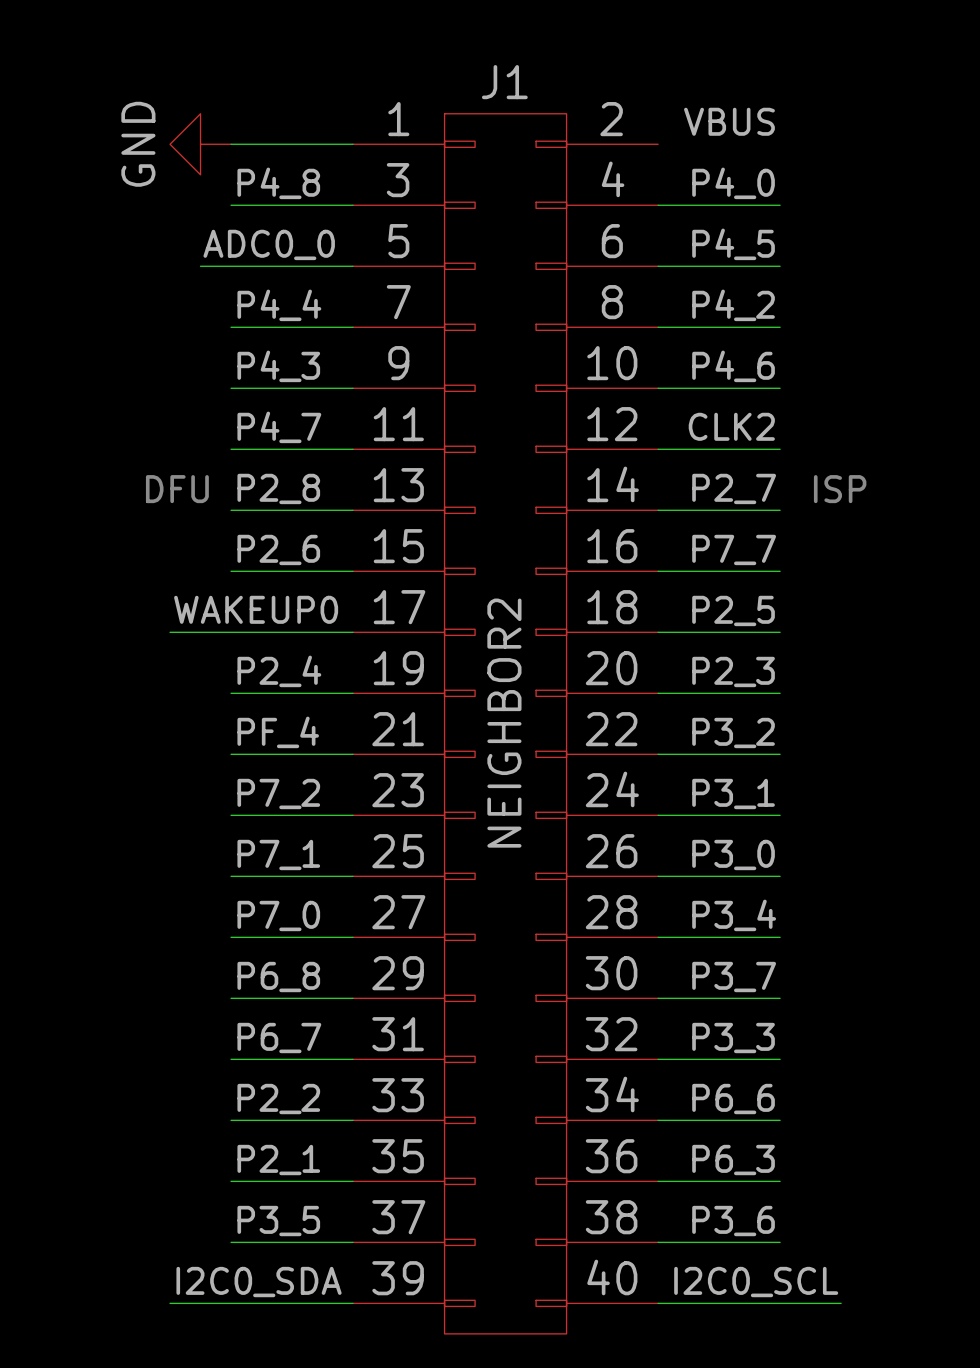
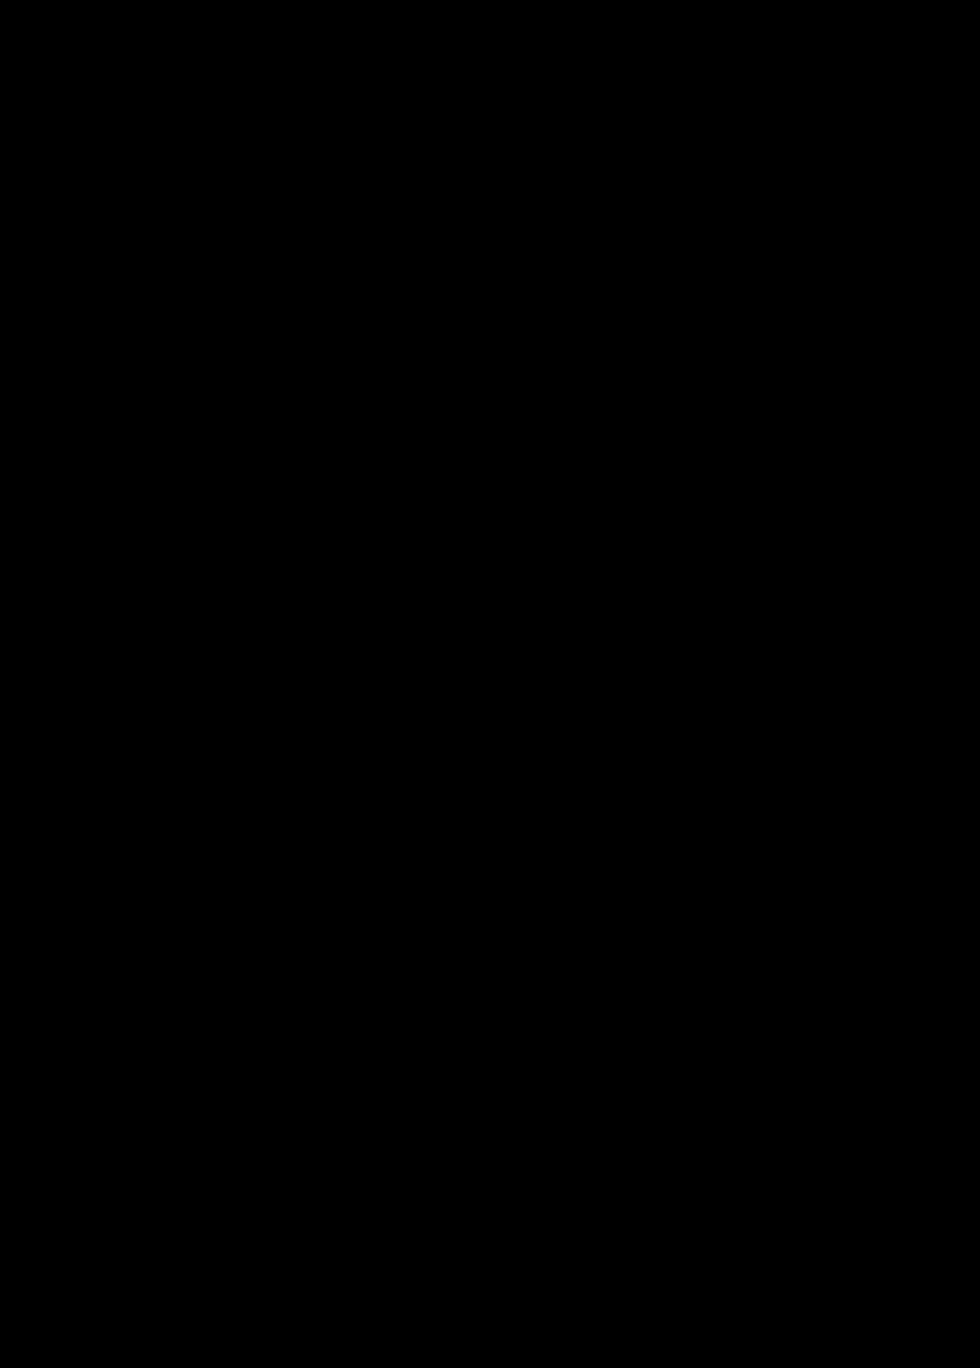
label: VBUS (729, 121) -> none
power symbol: GND (200, 144) -> none
wire: (231, 144) (353, 144) -> none
label: P4_8 (278, 183) -> none
label: P4_0 (733, 183) -> none
wire: (231, 205) (353, 205) -> none
wire: (658, 205) (780, 205) -> none
label: ADC0_0 (269, 244) -> none
label: P4_5 (733, 244) -> none
wire: (200, 266) (353, 266) -> none
wire: (658, 266) (780, 266) -> none
label: P4_4 (279, 305) -> none
label: P4_2 (733, 305) -> none
wire: (231, 327) (353, 327) -> none
wire: (658, 327) (780, 327) -> none
label: P4_3 (278, 366) -> none
label: P4_6 (733, 366) -> none
wire: (231, 388) (353, 388) -> none
wire: (658, 388) (780, 388) -> none
label: CLK2 (731, 426) -> none
label: P4_7 (279, 427) -> none
wire: (231, 449) (353, 449) -> none
wire: (658, 449) (780, 449) -> none
label: P2_8 (278, 488) -> none
label: P2_7 (734, 488) -> none
text: DFU (177, 489) -> none
text: ISP (840, 489) -> none
wire: (231, 510) (353, 510) -> none
wire: (658, 510) (780, 510) -> none
label: P2_6 (278, 549) -> none
label: P7_7 (734, 549) -> none
wire: (231, 571) (353, 571) -> none
wire: (658, 571) (780, 571) -> none
label: WAKEUP0 (256, 609) -> none
label: P2_5 (733, 610) -> none
wire: (170, 632) (353, 632) -> none
wire: (658, 632) (780, 632) -> none
label: P2_4 (279, 671) -> none
label: P2_3 (733, 671) -> none
wire: (231, 693) (353, 693) -> none
wire: (658, 693) (780, 693) -> none
J1: NEIGHBOR2 (505, 723) -> none
label: PF_4 (278, 732) -> none
label: P3_2 (733, 732) -> none
wire: (231, 754) (353, 754) -> none
wire: (658, 754) (780, 754) -> none
label: P7_2 (278, 793) -> none
label: P3_1 (733, 793) -> none
wire: (231, 815) (353, 815) -> none
wire: (658, 815) (780, 815) -> none
label: P7_1 (278, 854) -> none
label: P3_0 (733, 854) -> none
wire: (231, 876) (353, 876) -> none
wire: (658, 876) (780, 876) -> none
label: P7_0 (278, 915) -> none
label: P3_4 (734, 915) -> none
wire: (231, 937) (353, 937) -> none
wire: (658, 937) (780, 937) -> none
label: P6_8 (278, 977) -> none
label: P3_7 (734, 977) -> none
wire: (231, 998) (353, 998) -> none
wire: (658, 998) (780, 998) -> none
label: P6_7 (279, 1038) -> none
label: P3_3 (733, 1038) -> none
wire: (231, 1059) (353, 1059) -> none
wire: (658, 1059) (780, 1059) -> none
label: P2_2 (278, 1099) -> none
label: P6_6 (733, 1099) -> none
wire: (231, 1120) (353, 1120) -> none
wire: (658, 1120) (780, 1120) -> none
label: P2_1 (278, 1160) -> none
label: P6_3 (733, 1160) -> none
wire: (231, 1181) (353, 1181) -> none
wire: (658, 1181) (780, 1181) -> none
label: P3_5 (278, 1221) -> none
label: P3_6 (733, 1221) -> none
wire: (231, 1242) (353, 1242) -> none
wire: (658, 1242) (780, 1242) -> none
label: I2C0_SDA (259, 1282) -> none
label: I2C0_SCL (756, 1282) -> none
wire: (170, 1303) (353, 1303) -> none
wire: (658, 1303) (841, 1303) -> none

